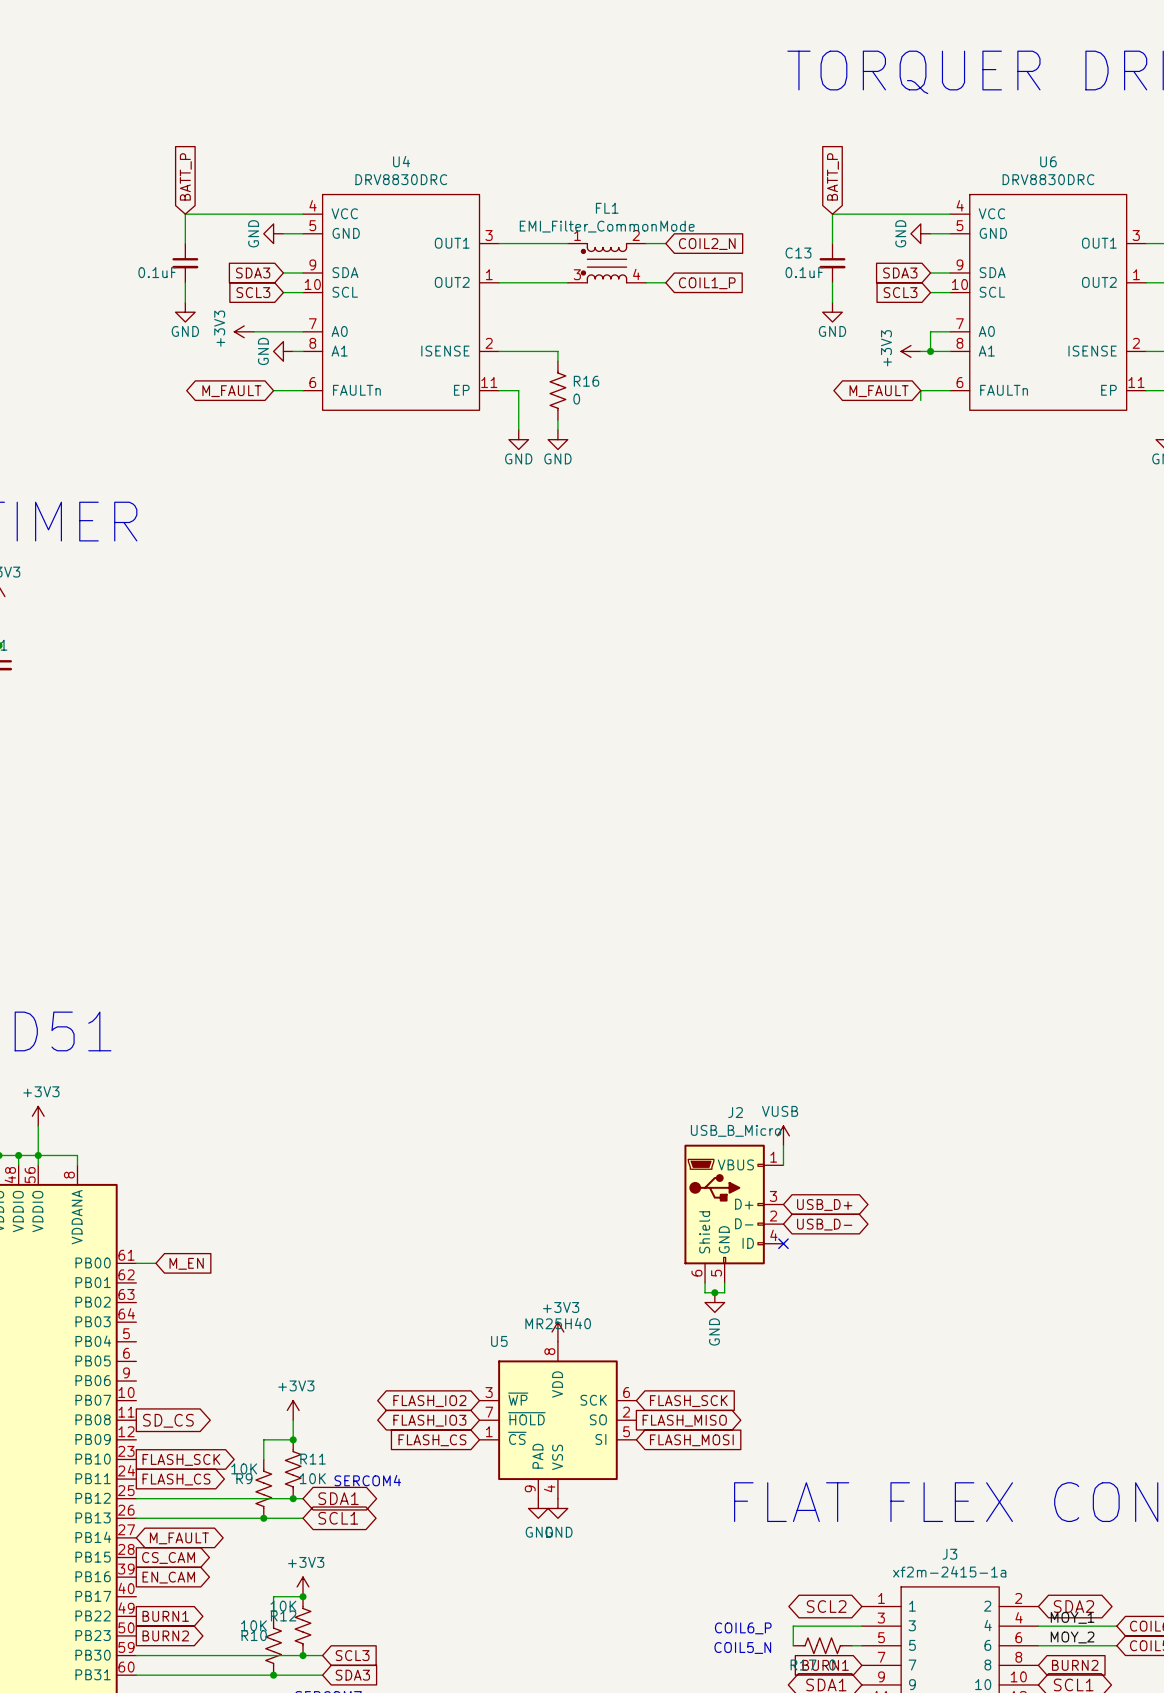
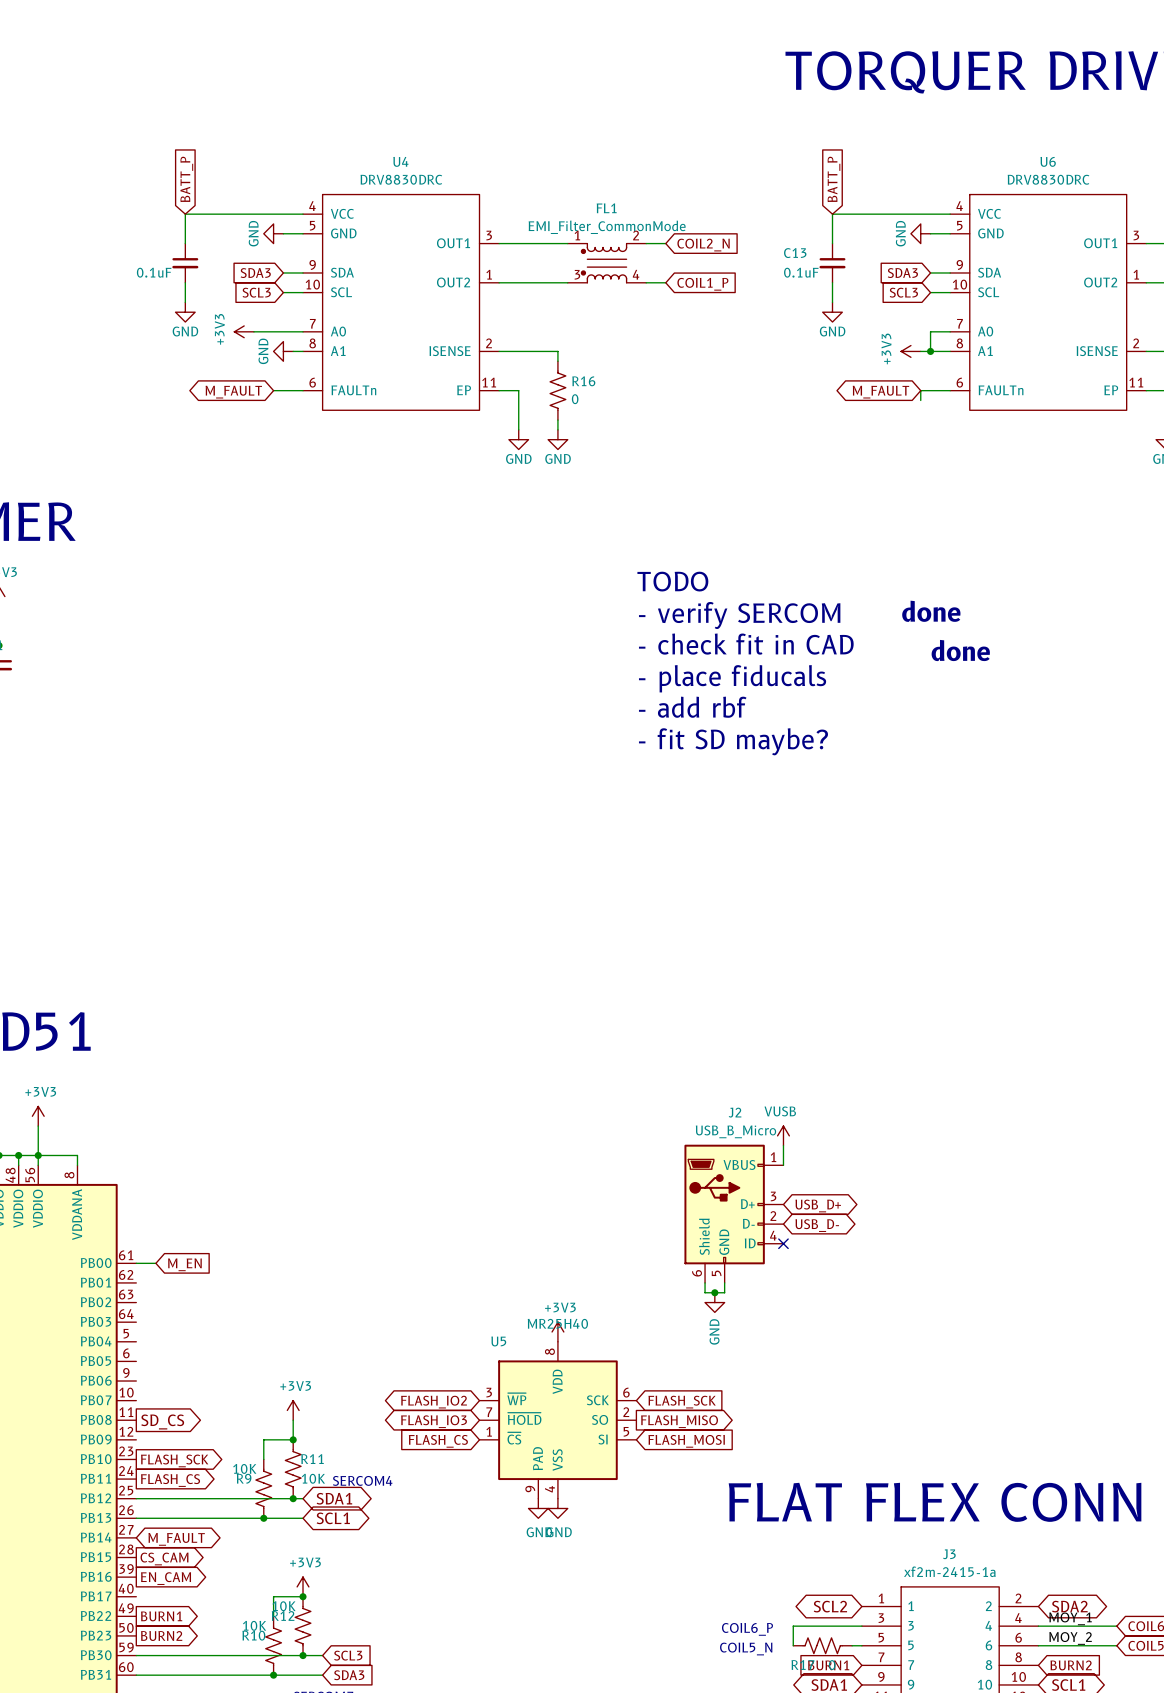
text: none -> TODO (672, 581)
text: none -> done (931, 611)
text: none -> - verify SERCOM (739, 615)
text: none -> - check fit in CAD (746, 644)
text: none -> done (960, 650)
text: none -> - place fiducals (732, 678)
text: none -> - add rbf (692, 707)
text: none -> - fit SD maybe? (733, 741)

